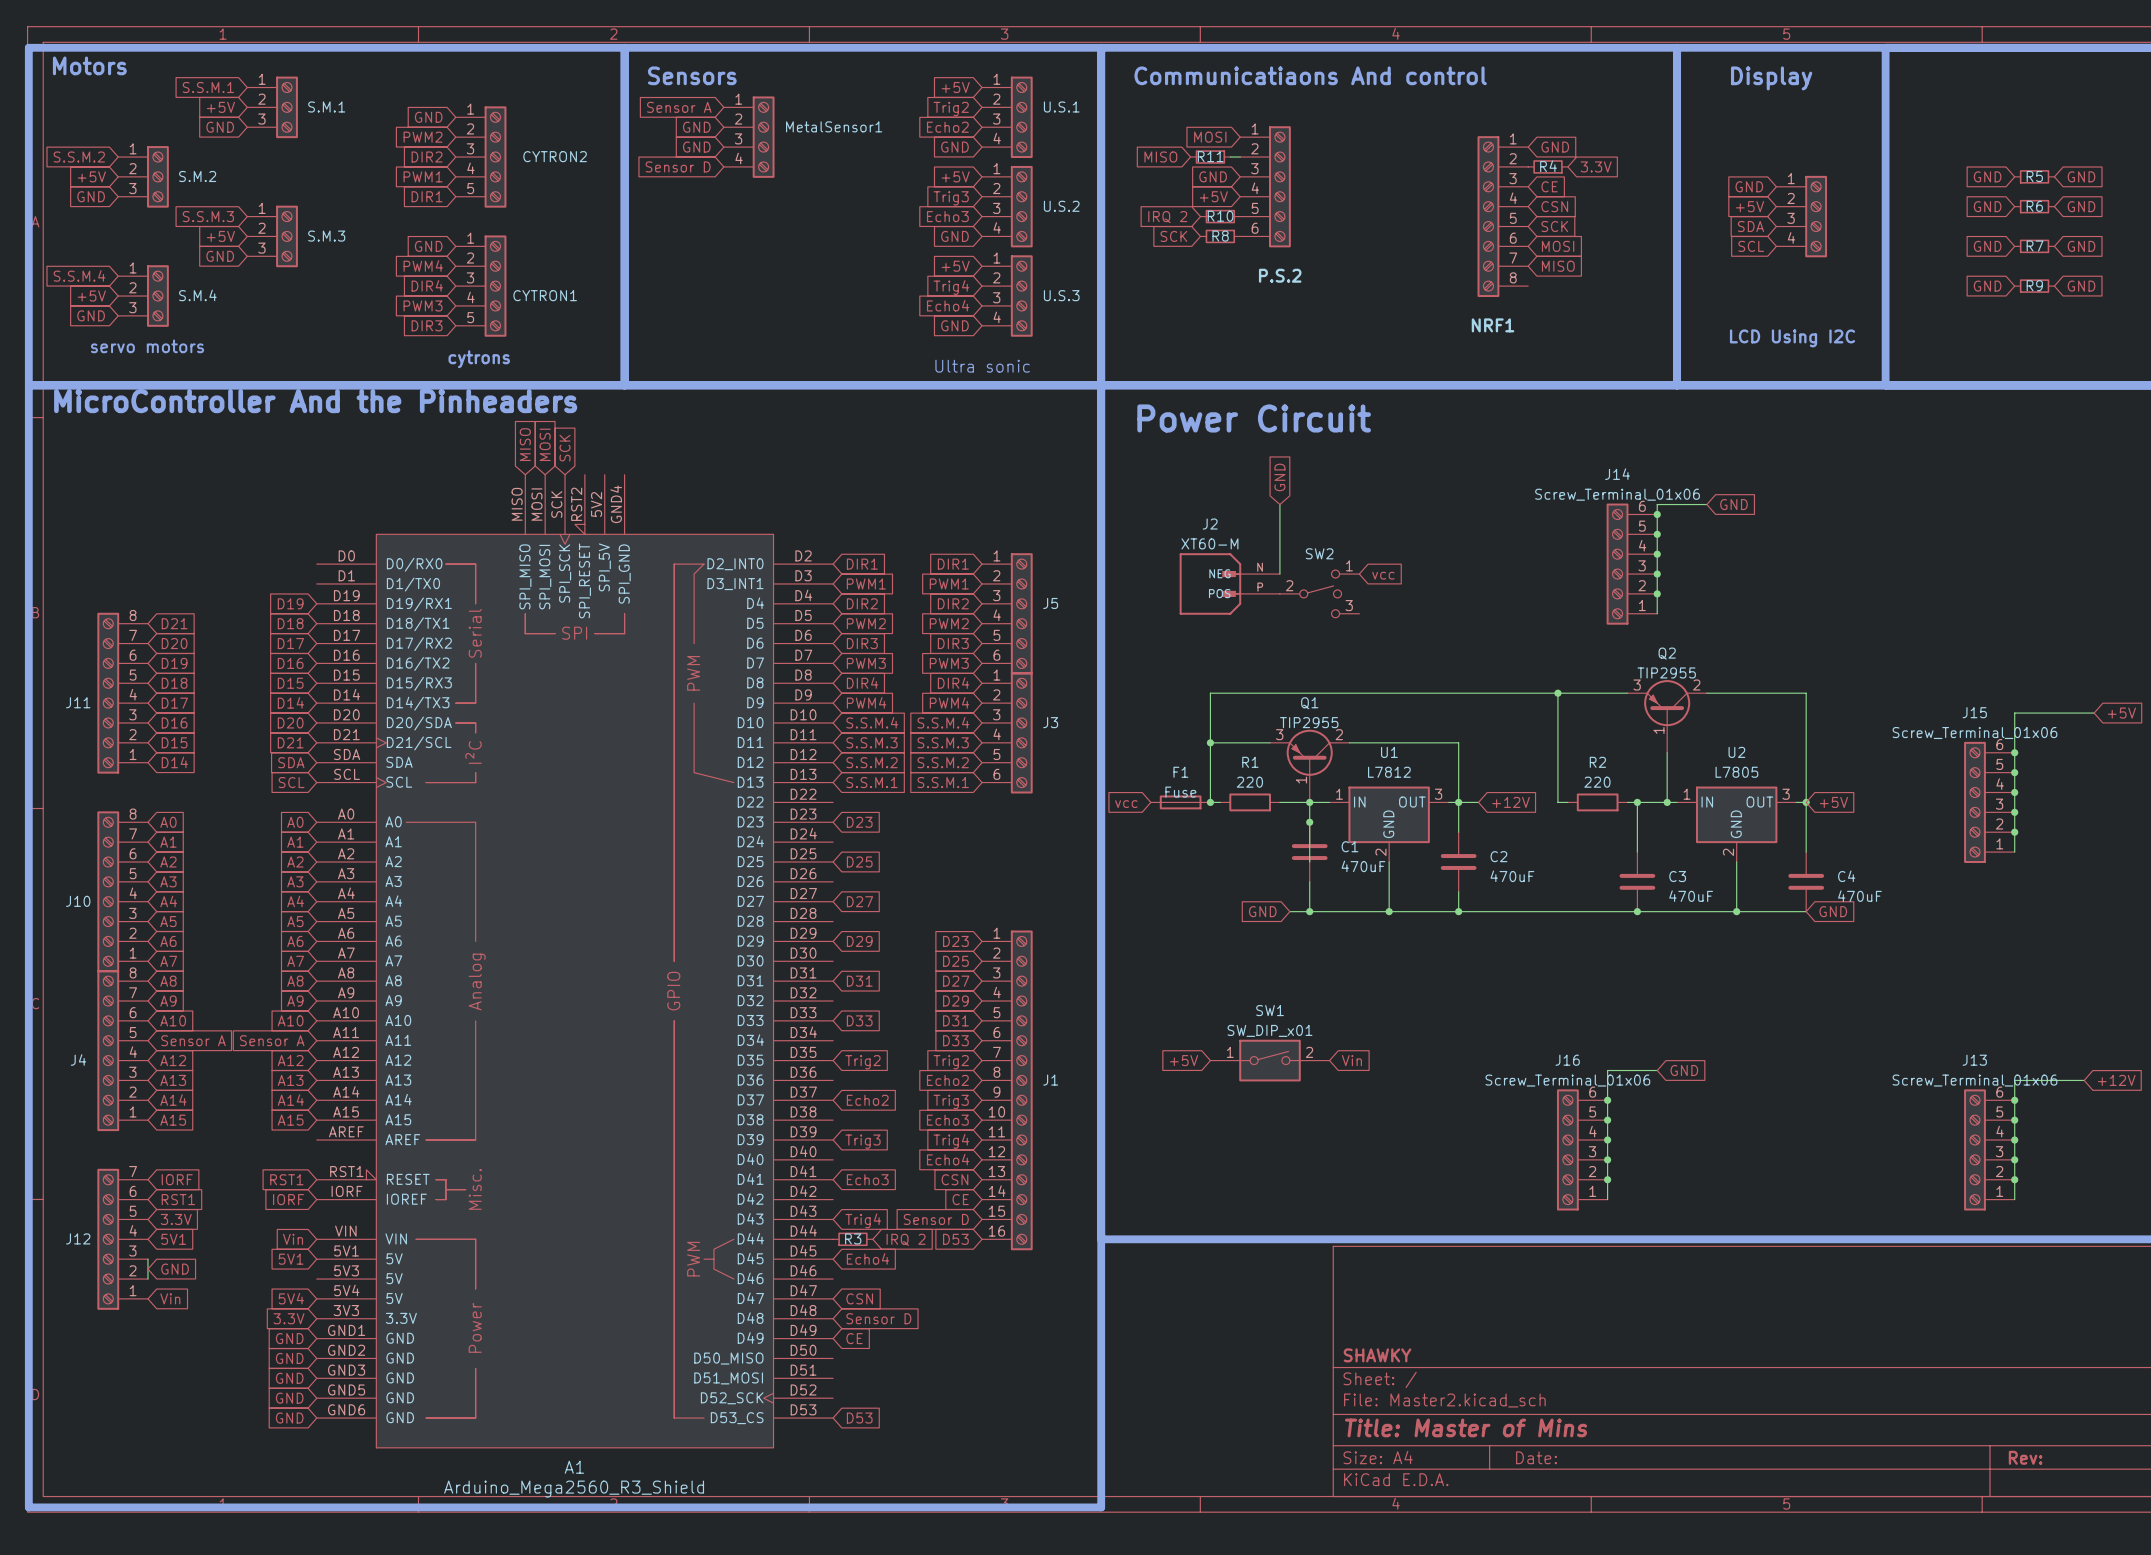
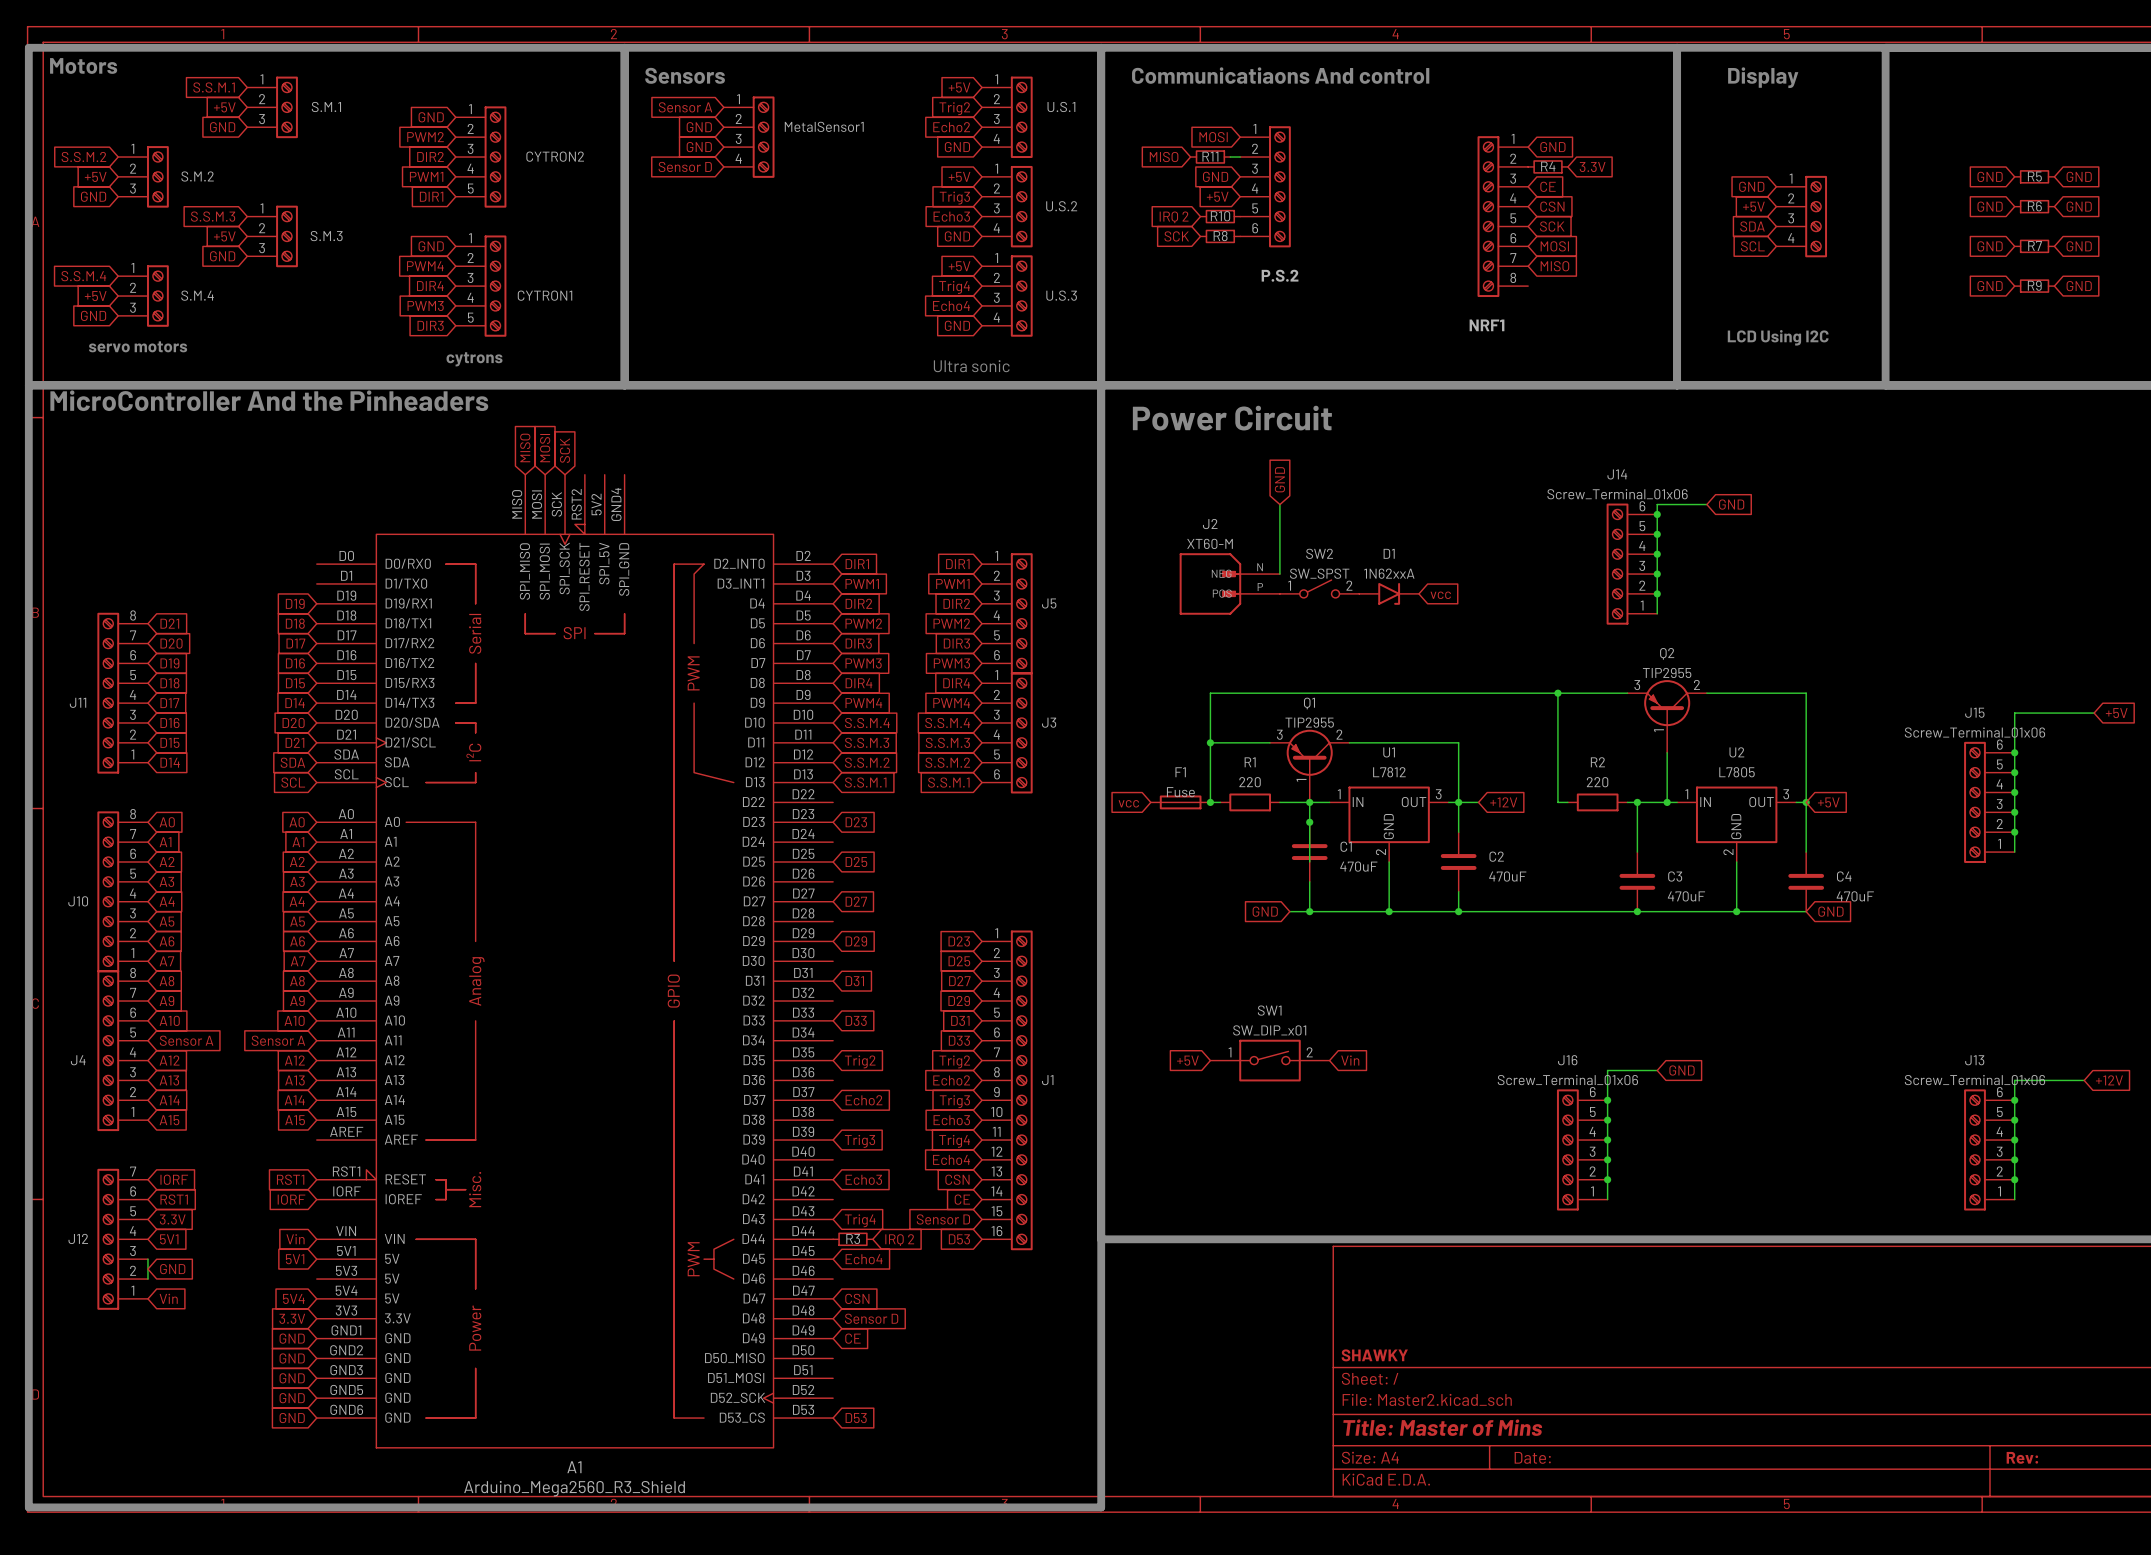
SW2 symbol: [1279, 570, 1360, 618] -> [1279, 580, 1360, 598]
SW2 value: none -> SW_SPST (1319, 573)
global label position: vcc (1383, 575) -> vcc (1440, 595)
D1: none -> 1N62xxA (1389, 593)

